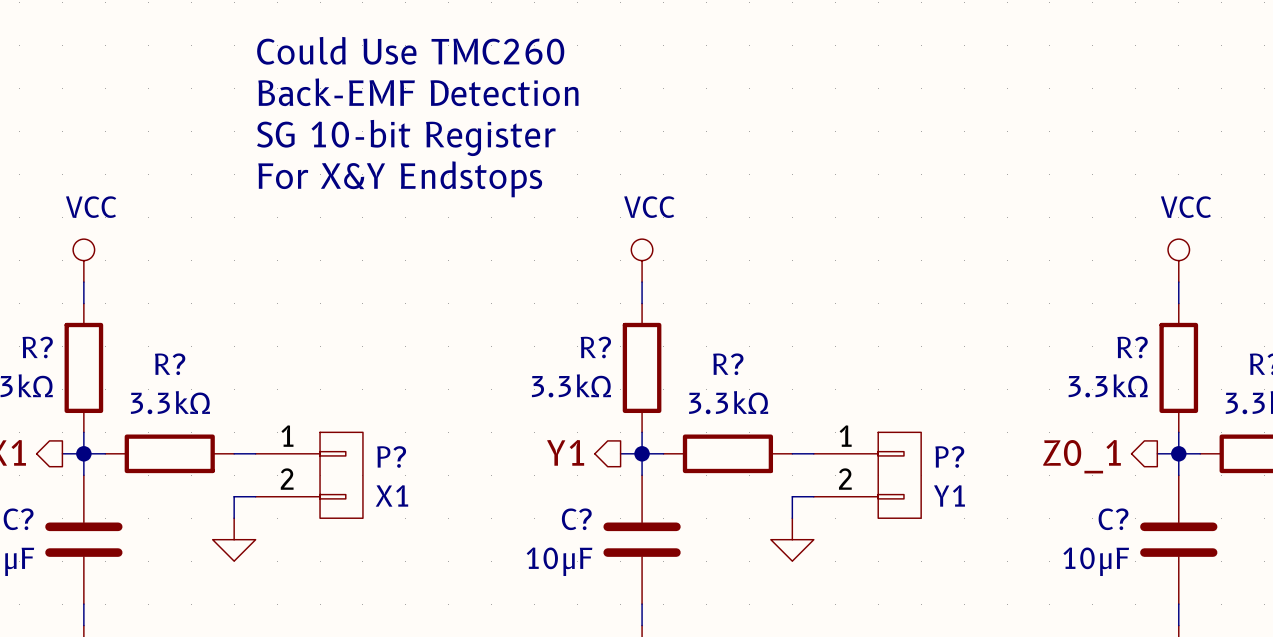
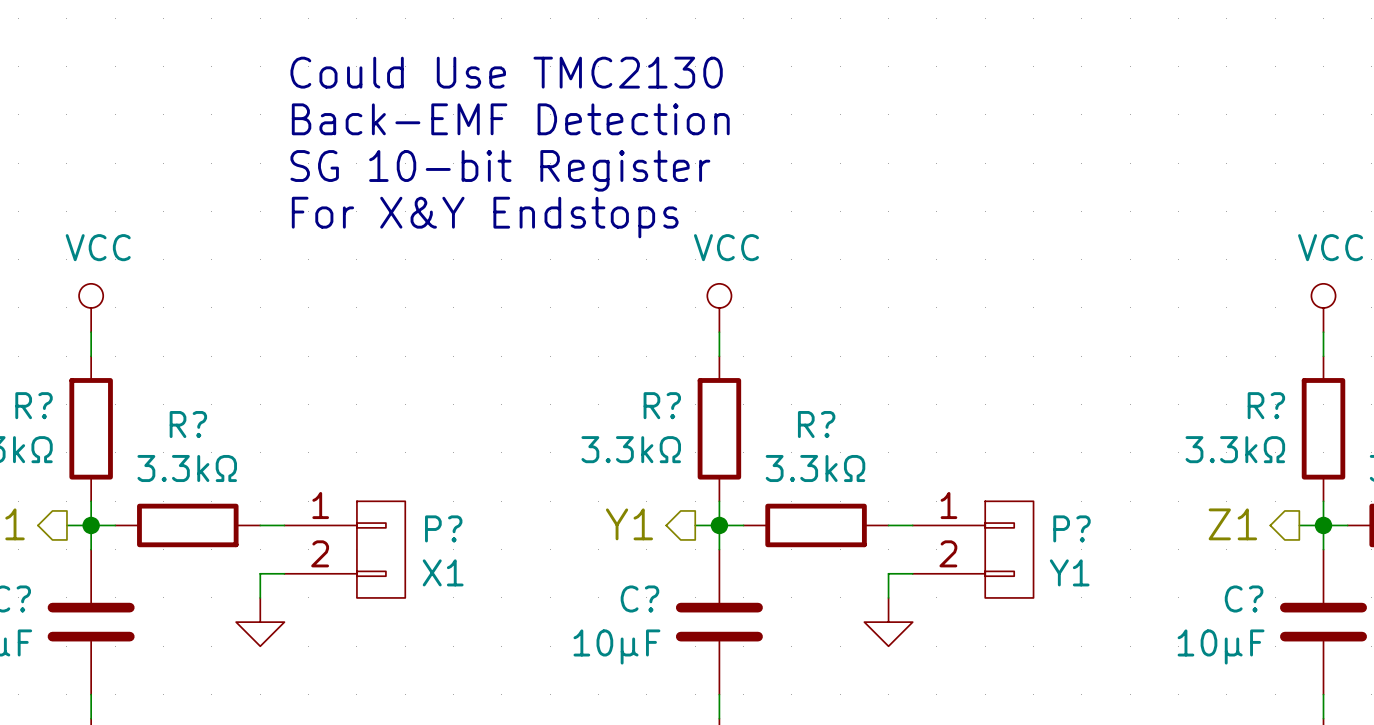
text: Could Use TMC260 (410, 50) -> Could Use TMC2130 (506, 72)
hierarchical label: Z0_1 (1081, 456) -> Z1 (1232, 524)

